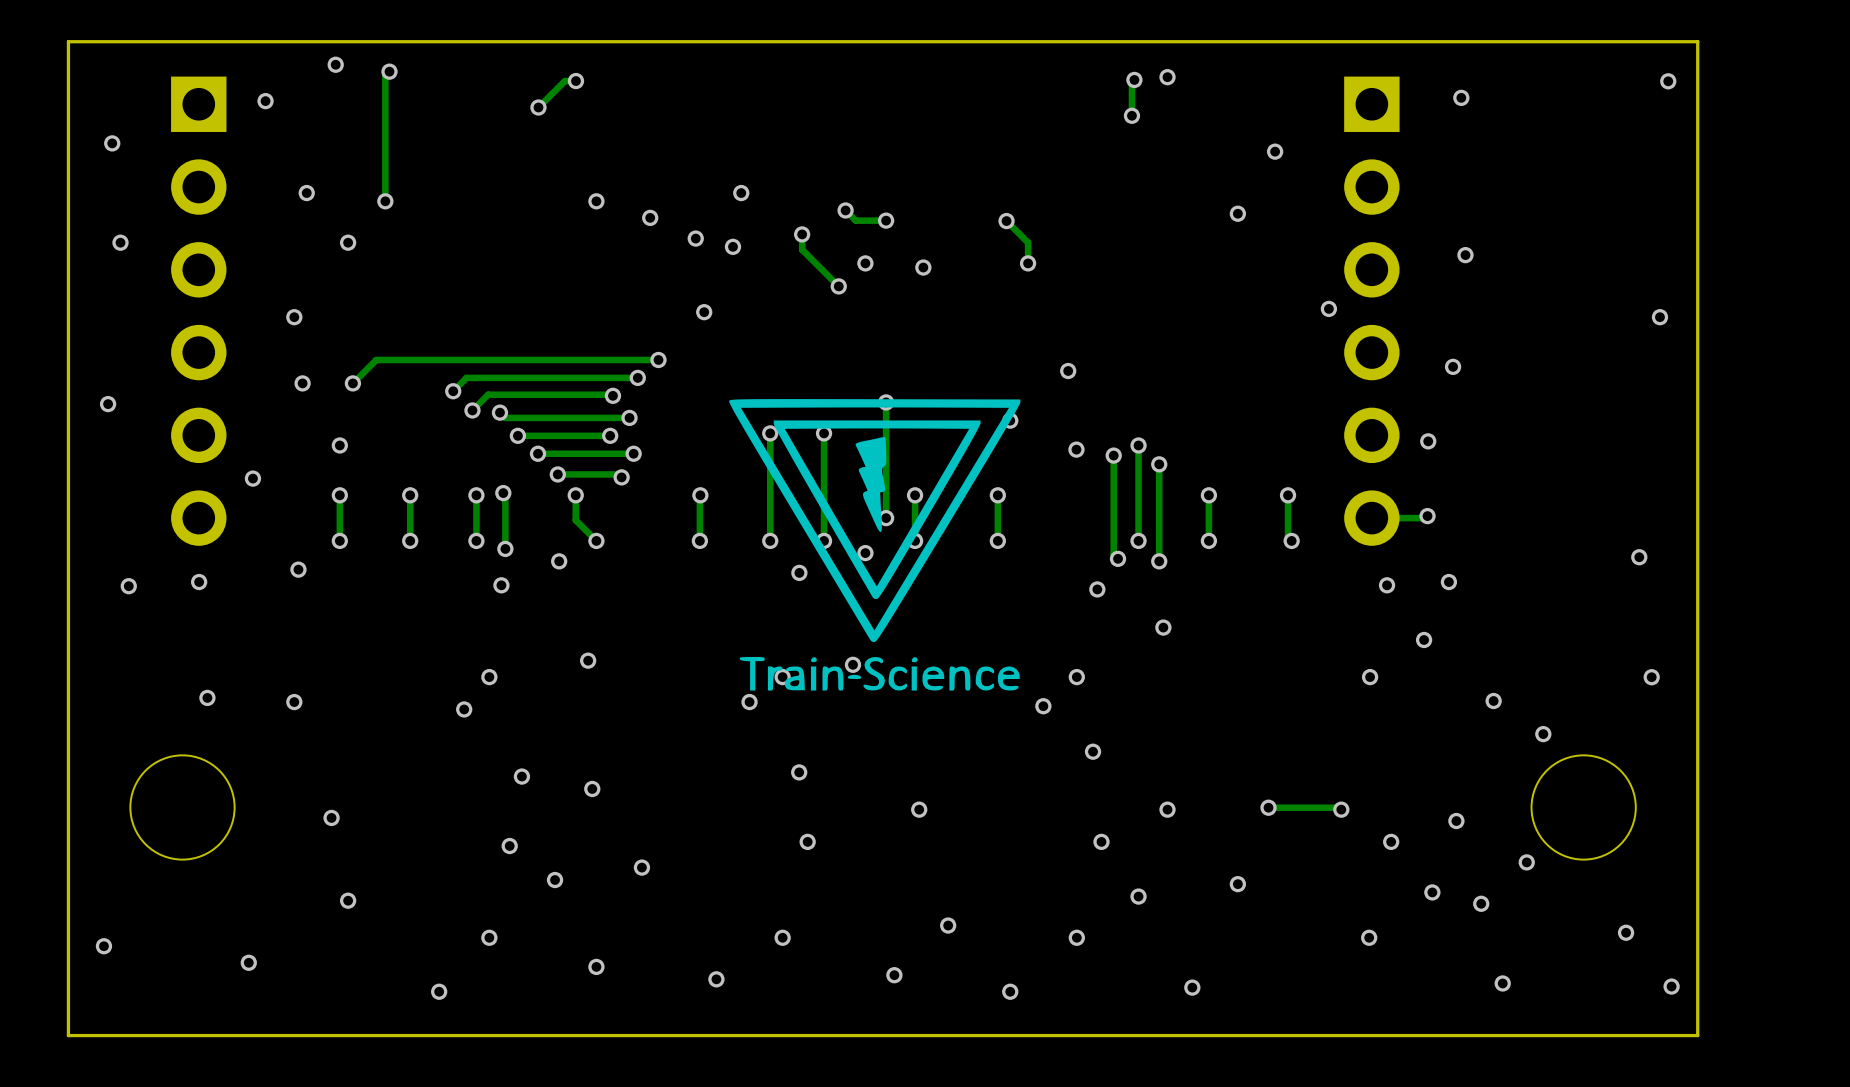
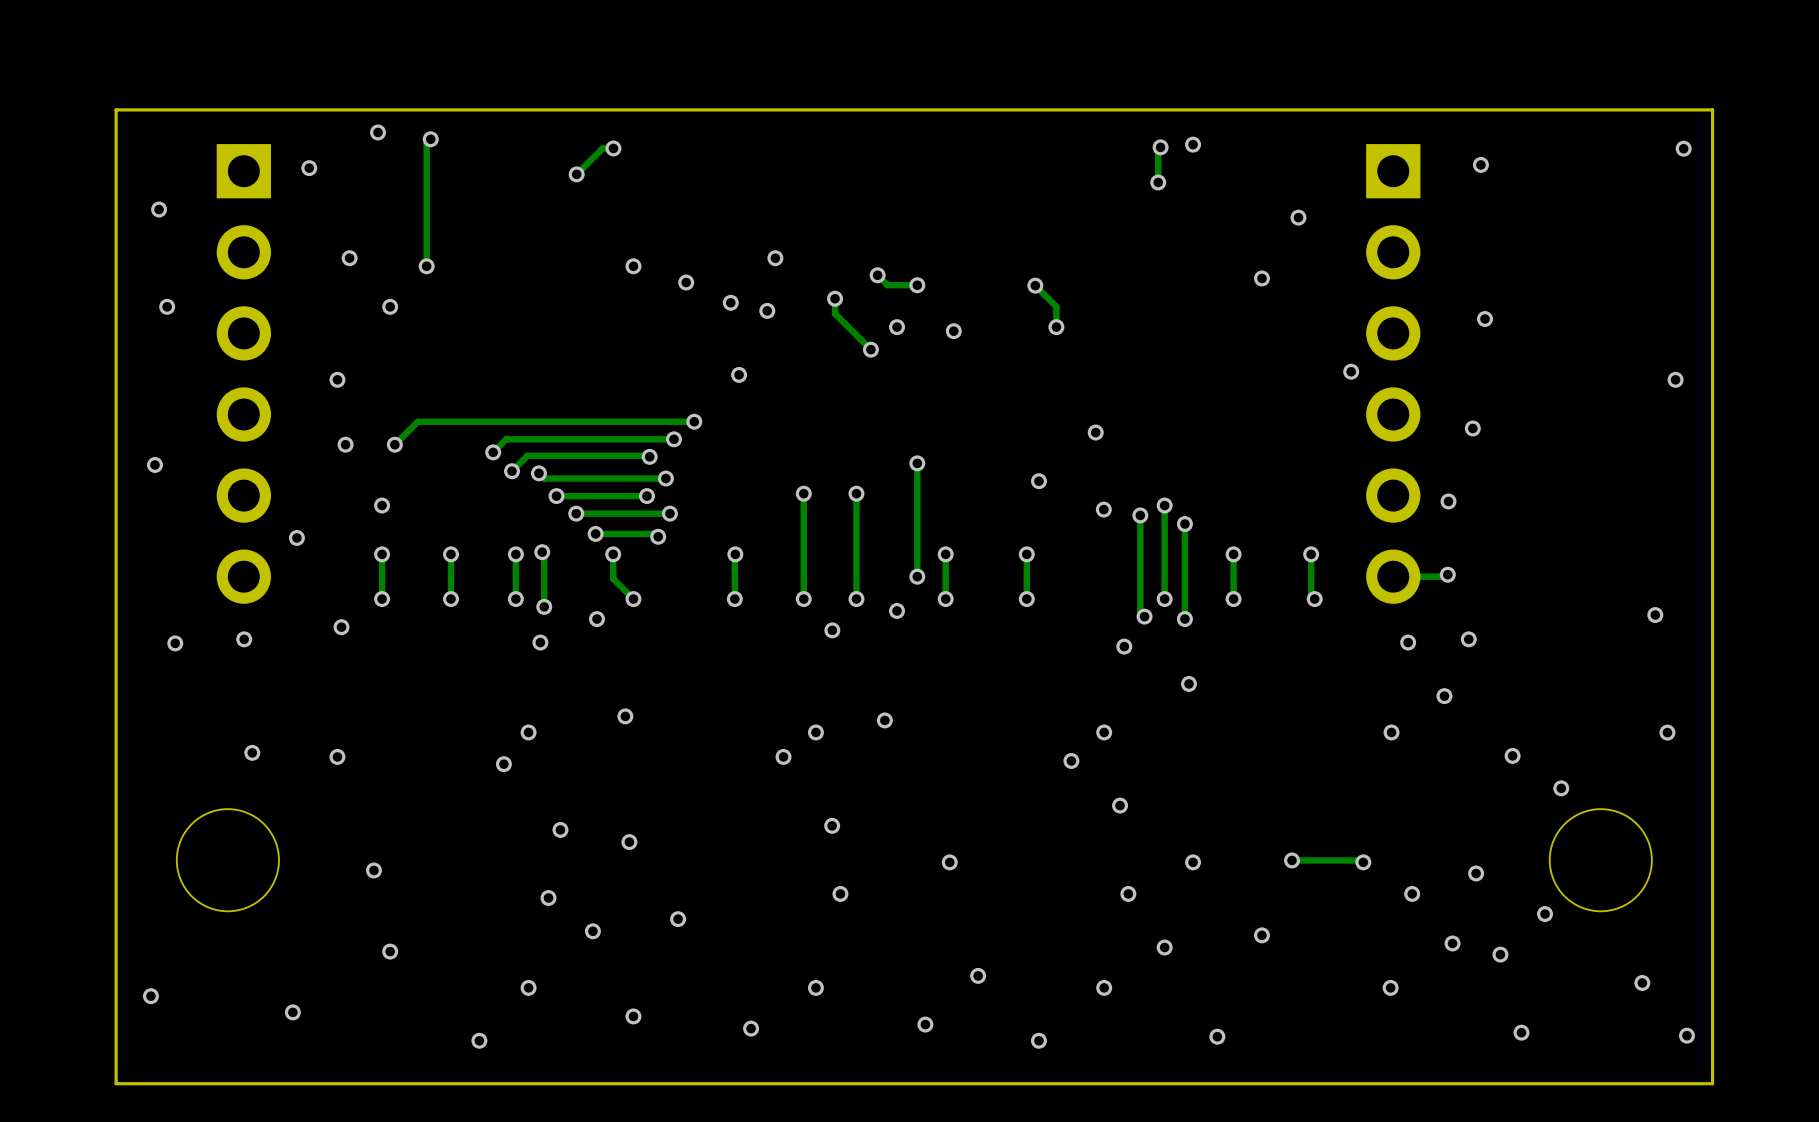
drawing: [729, 399, 1021, 691] -> none

